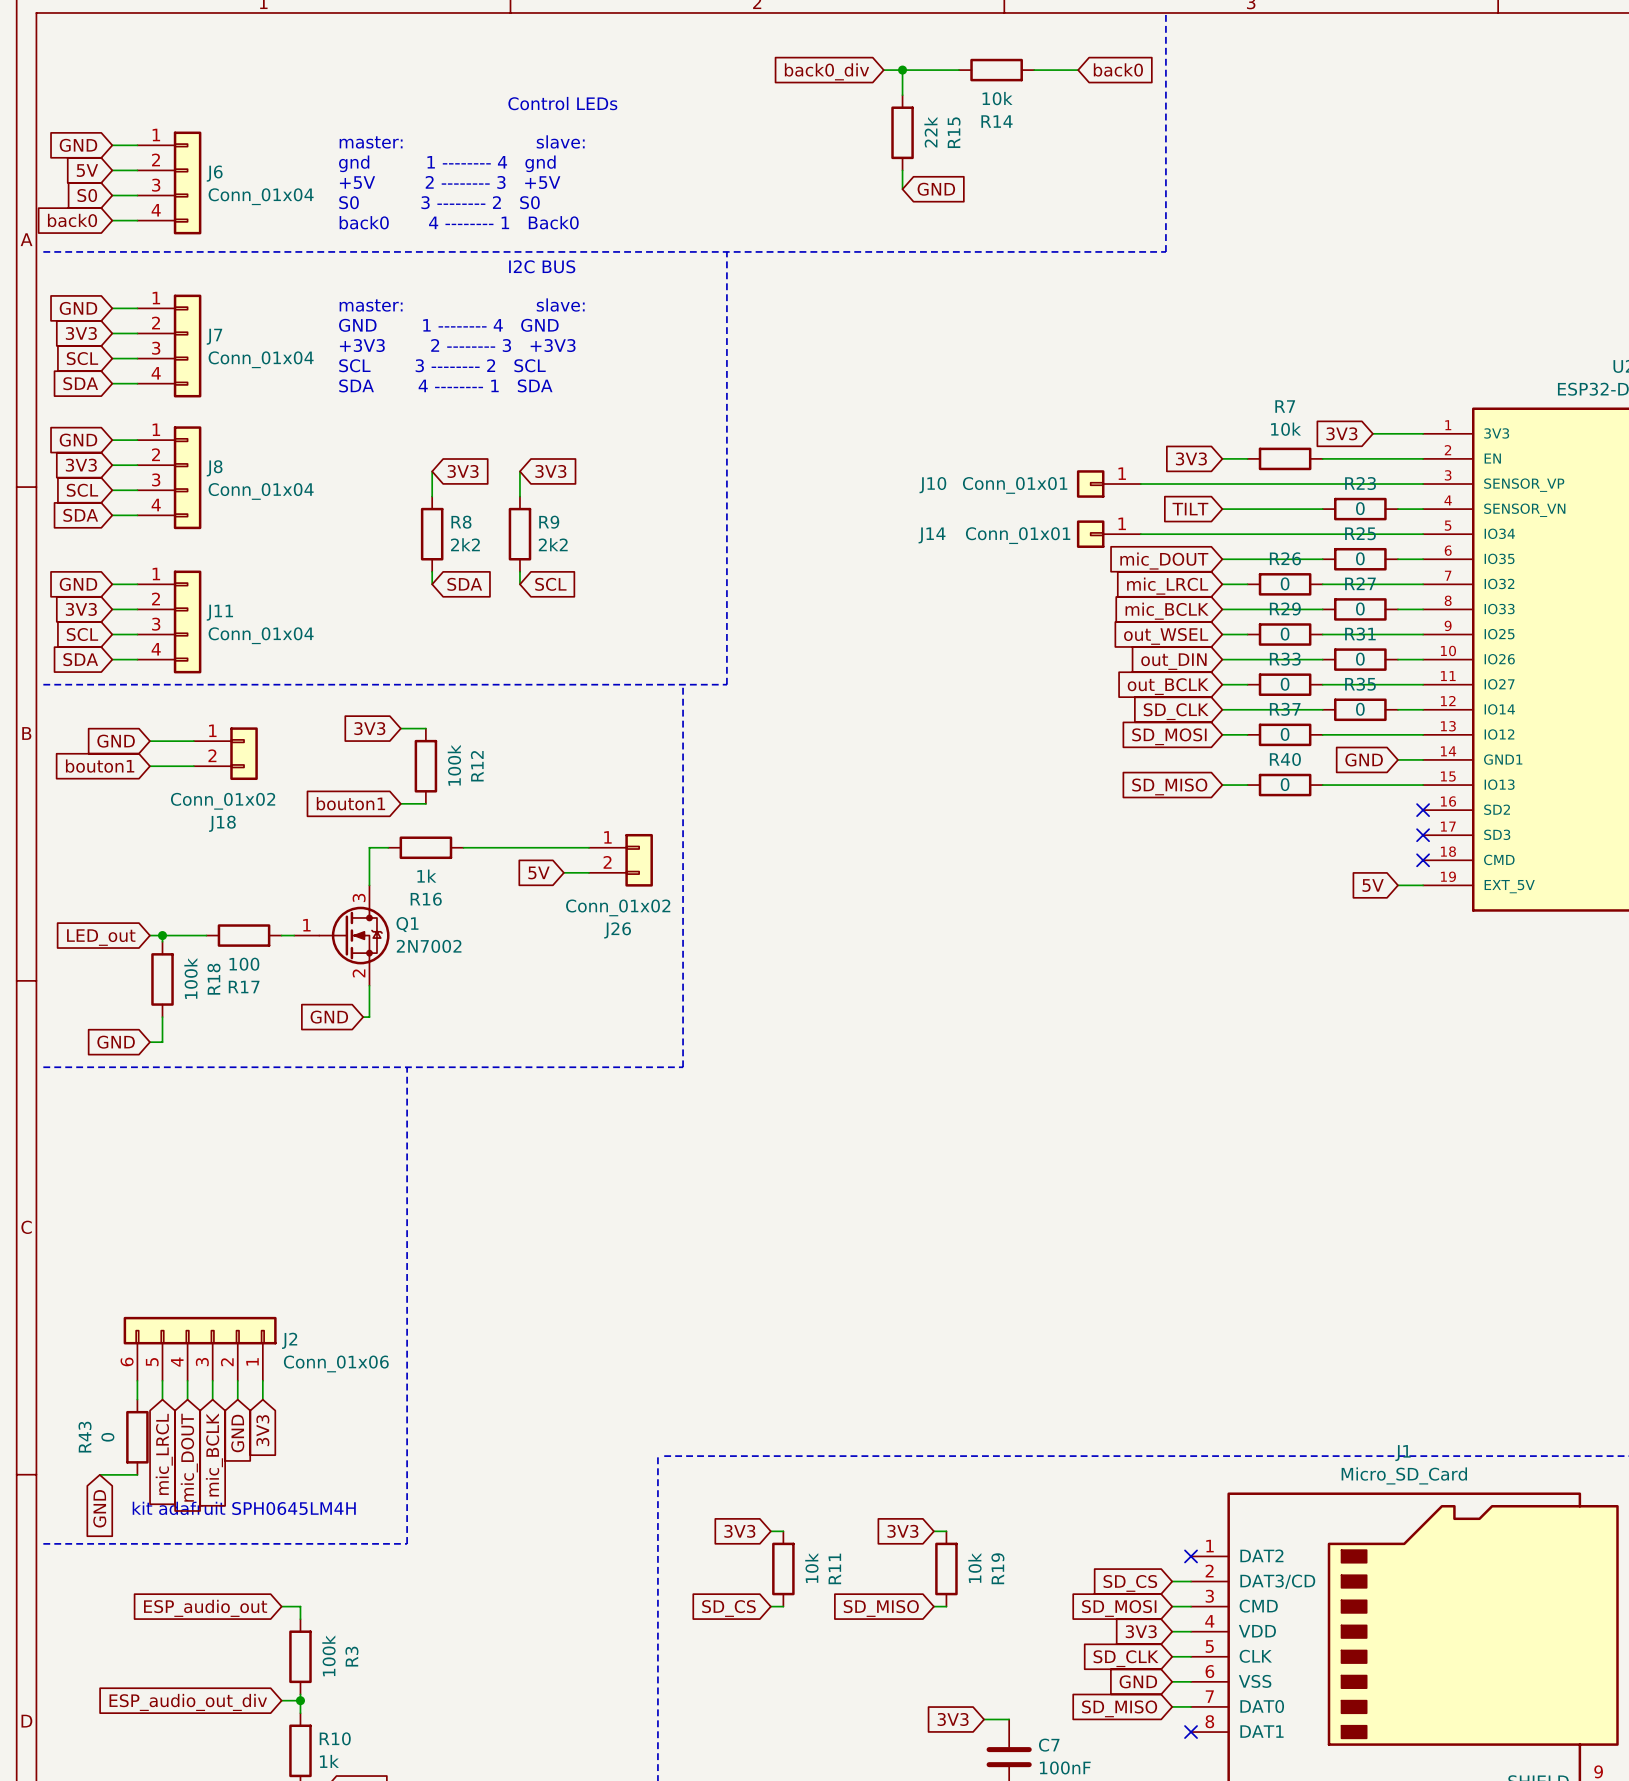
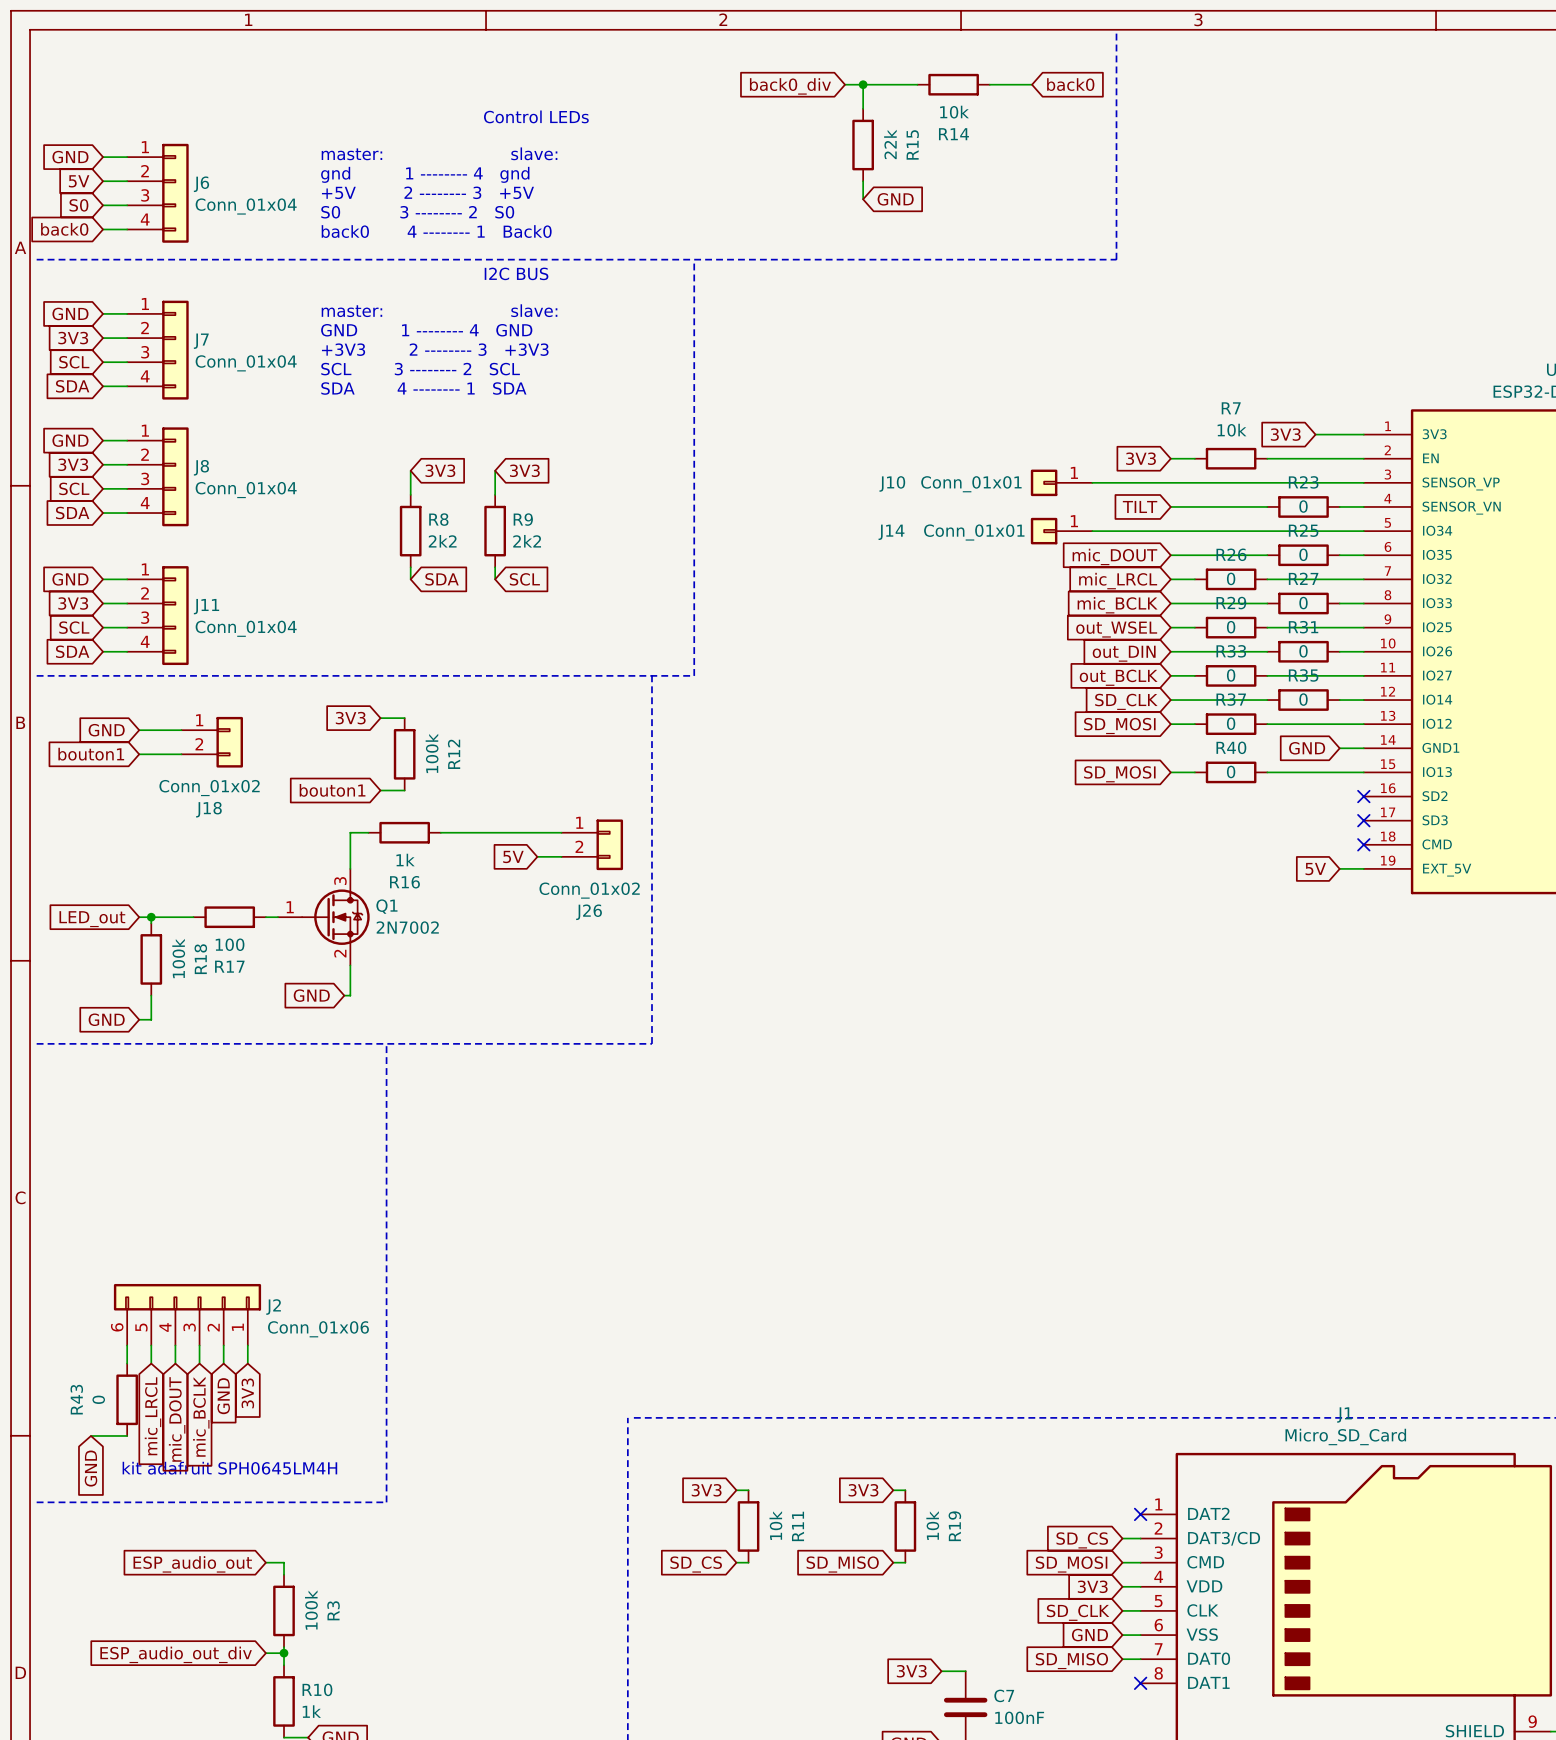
global label: SD_MISO (1169, 786) -> SD_MOSI (1119, 774)

